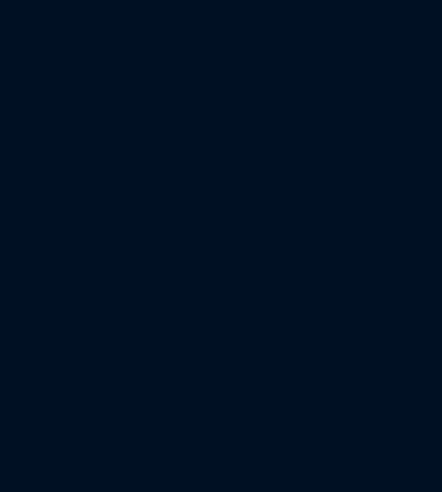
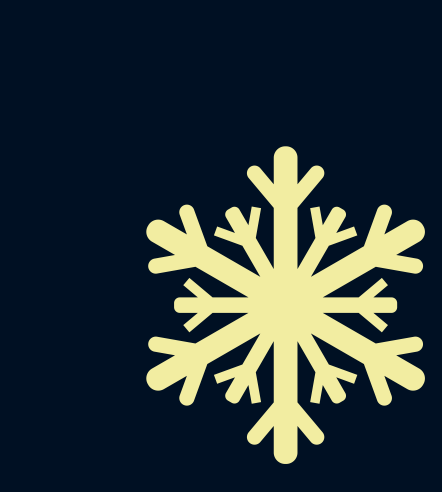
drawing: none -> [146, 146, 425, 464]

